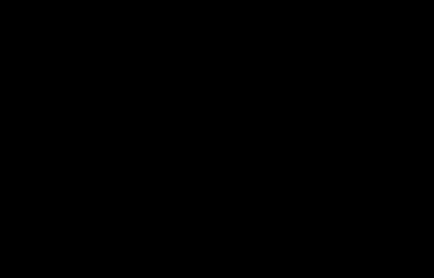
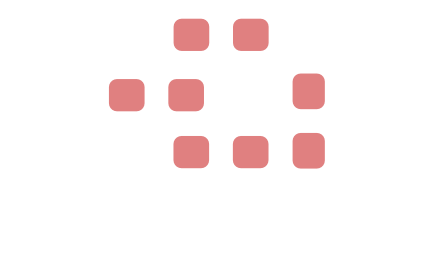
part: none -> (221, 34)
part: none -> (156, 95)
part: none -> (308, 121)
part: none -> (220, 152)

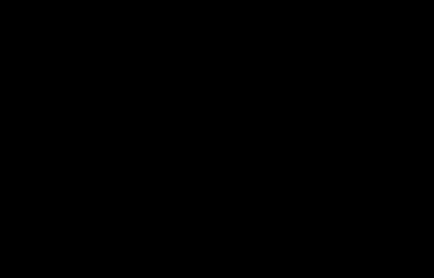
part: (221, 34) -> none
part: (156, 95) -> none
part: (308, 121) -> none
part: (220, 152) -> none

